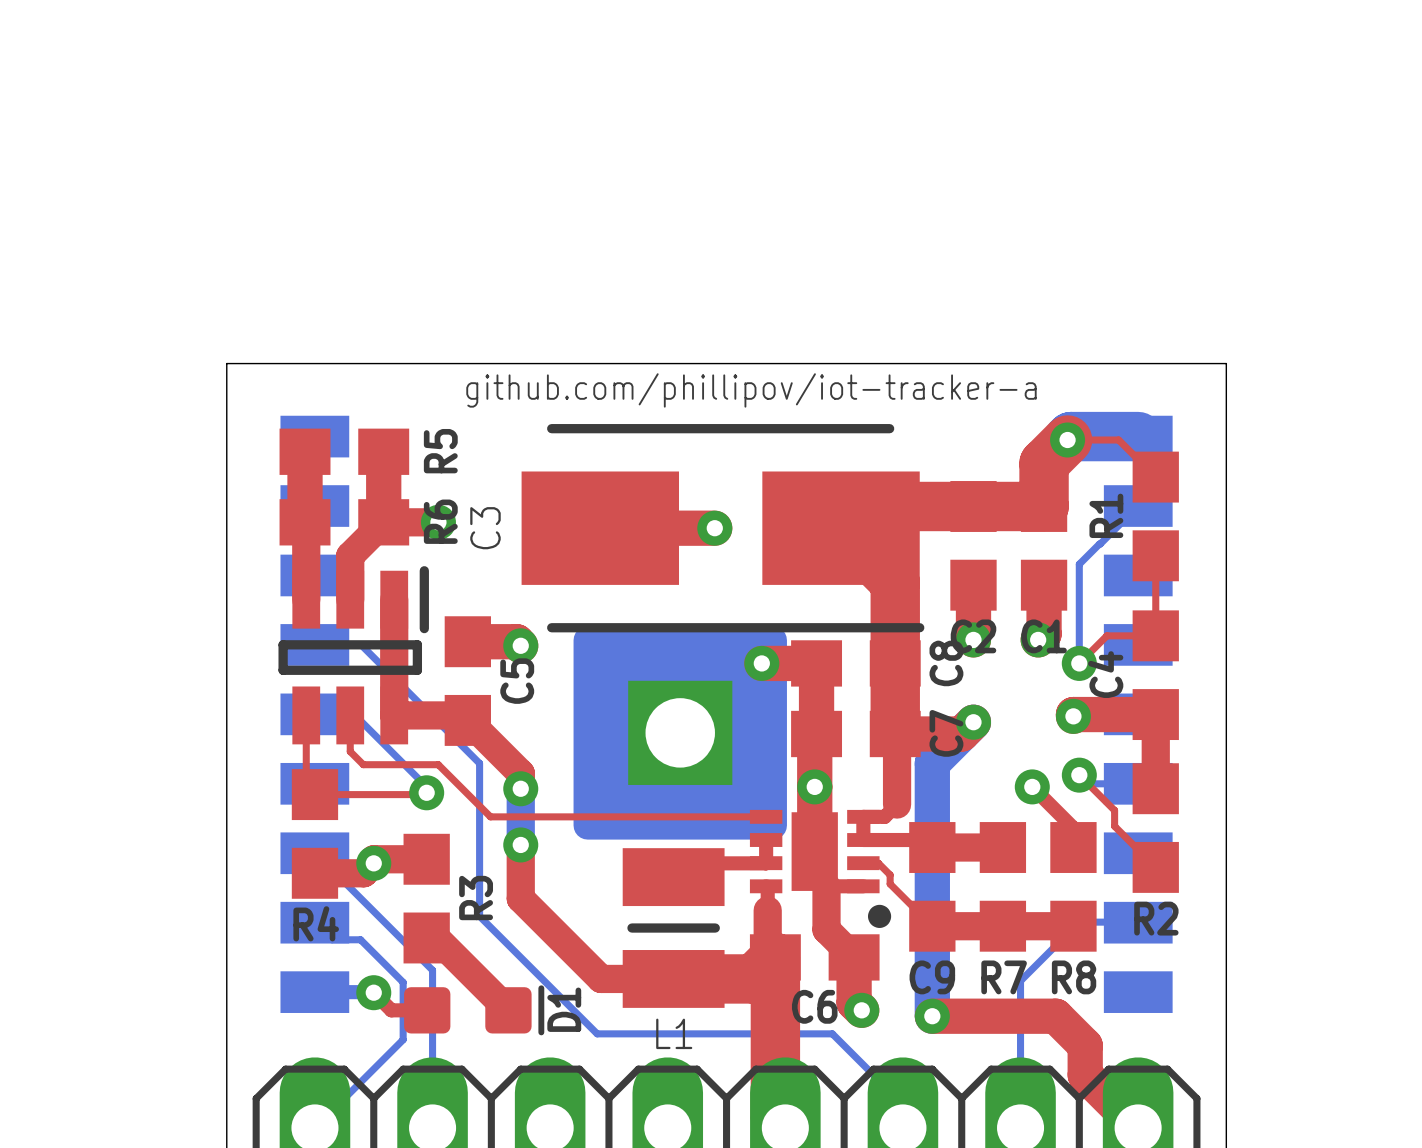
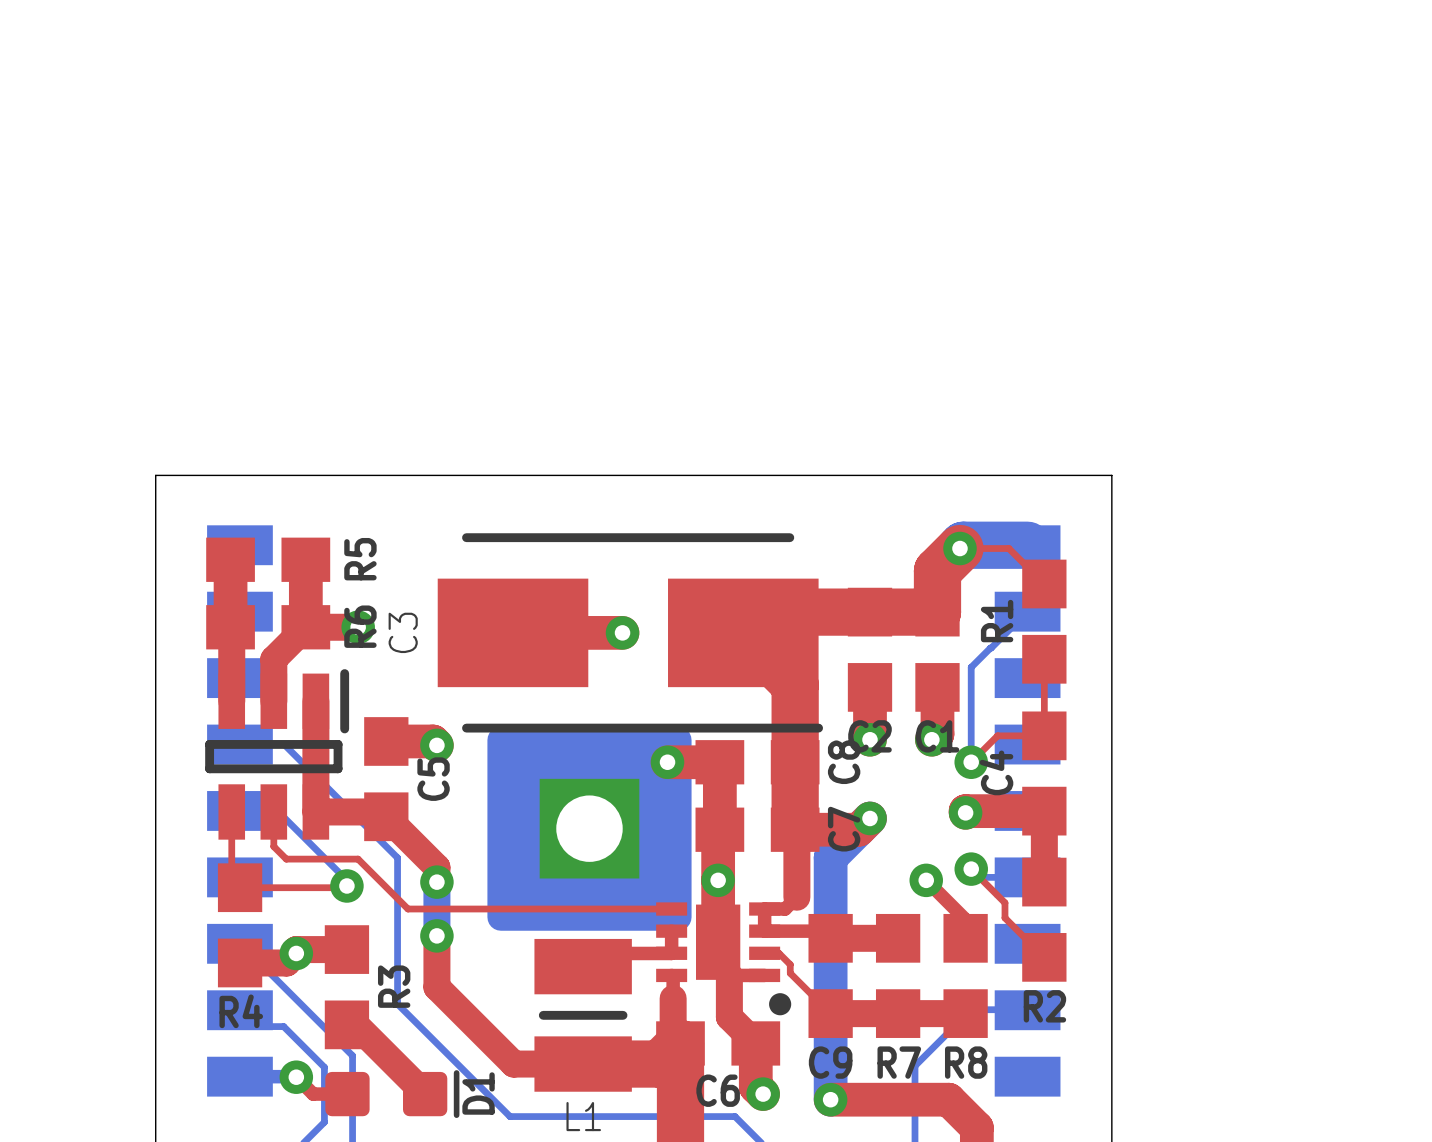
text: github.com/phillipov/iot-tracker-a (751, 390) -> none

